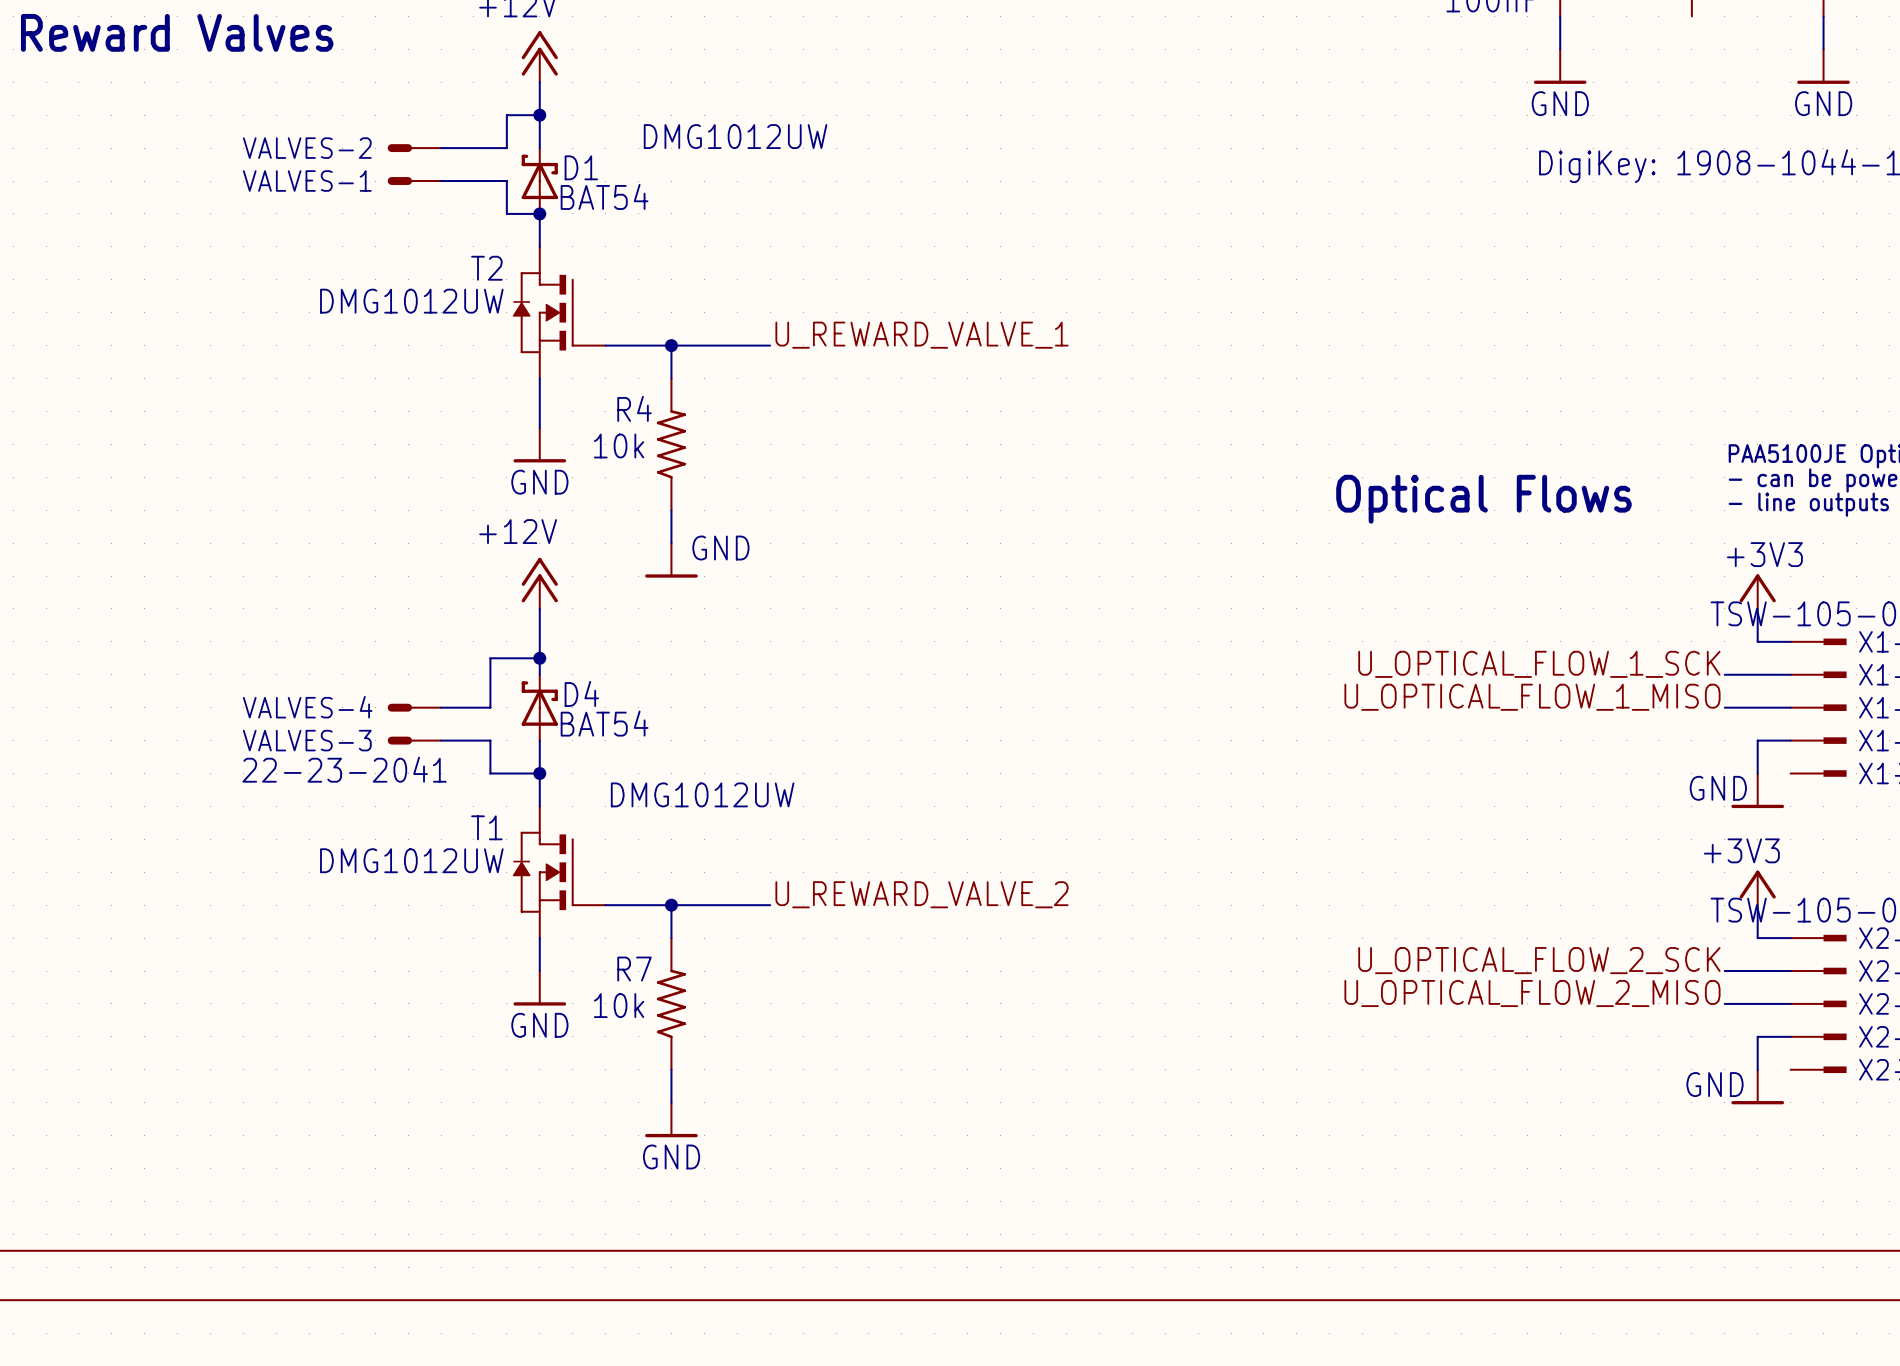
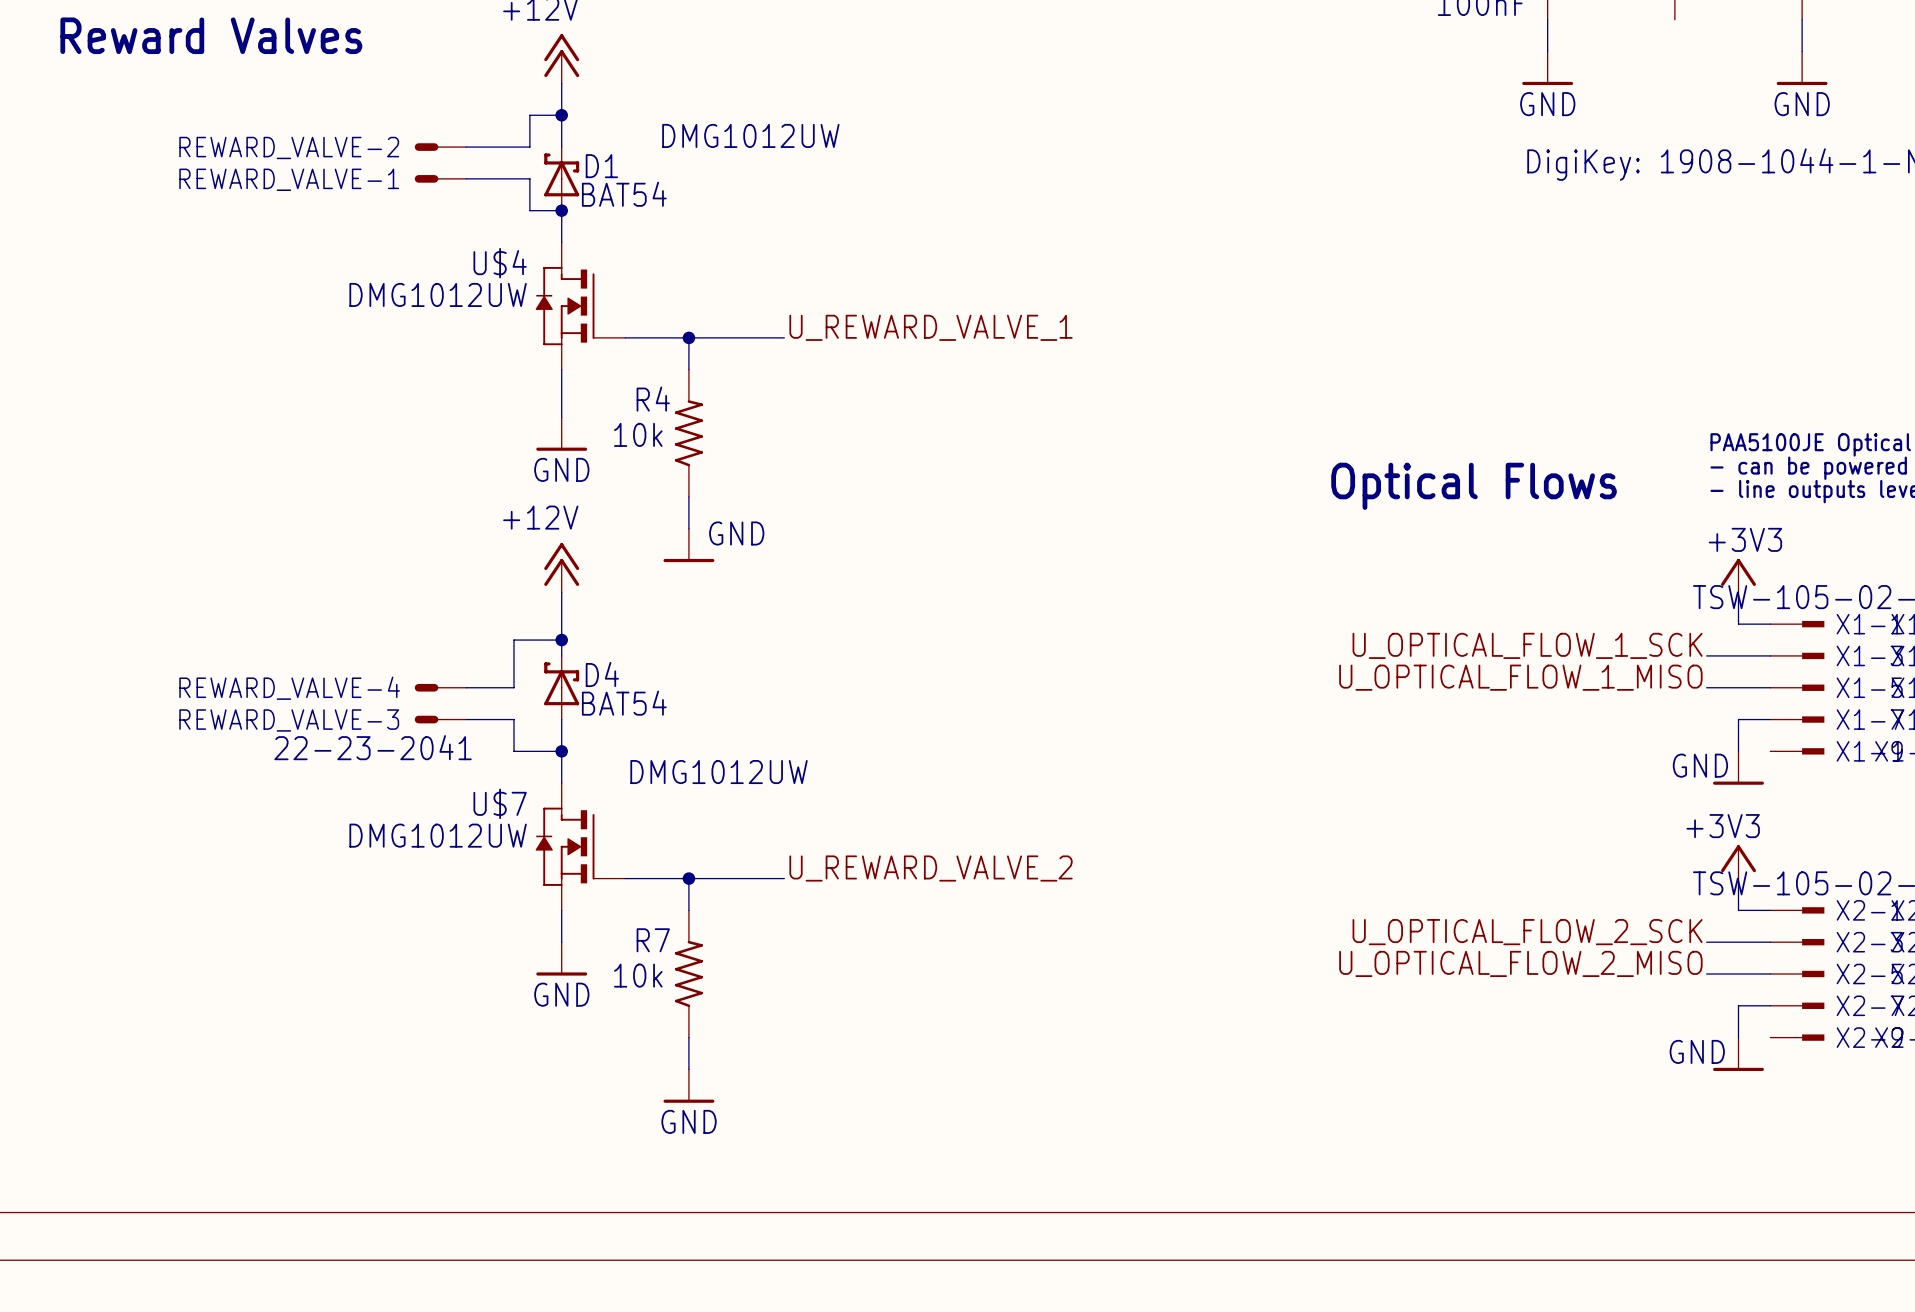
VALVES-2 name: VALVES-2 (307, 148) -> REWARD_VALVE-2 (289, 147)
VALVES-1 name: VALVES-1 (307, 181) -> REWARD_VALVE-1 (289, 179)
T2 name: T2 (486, 268) -> U$4 (500, 263)
VALVES-4 name: VALVES-4 (307, 707) -> REWARD_VALVE-4 (289, 688)
VALVES-3 name: VALVES-3 (307, 740) -> REWARD_VALVE-3 (289, 720)
T1 name: T1 (486, 827) -> U$7 (500, 803)

